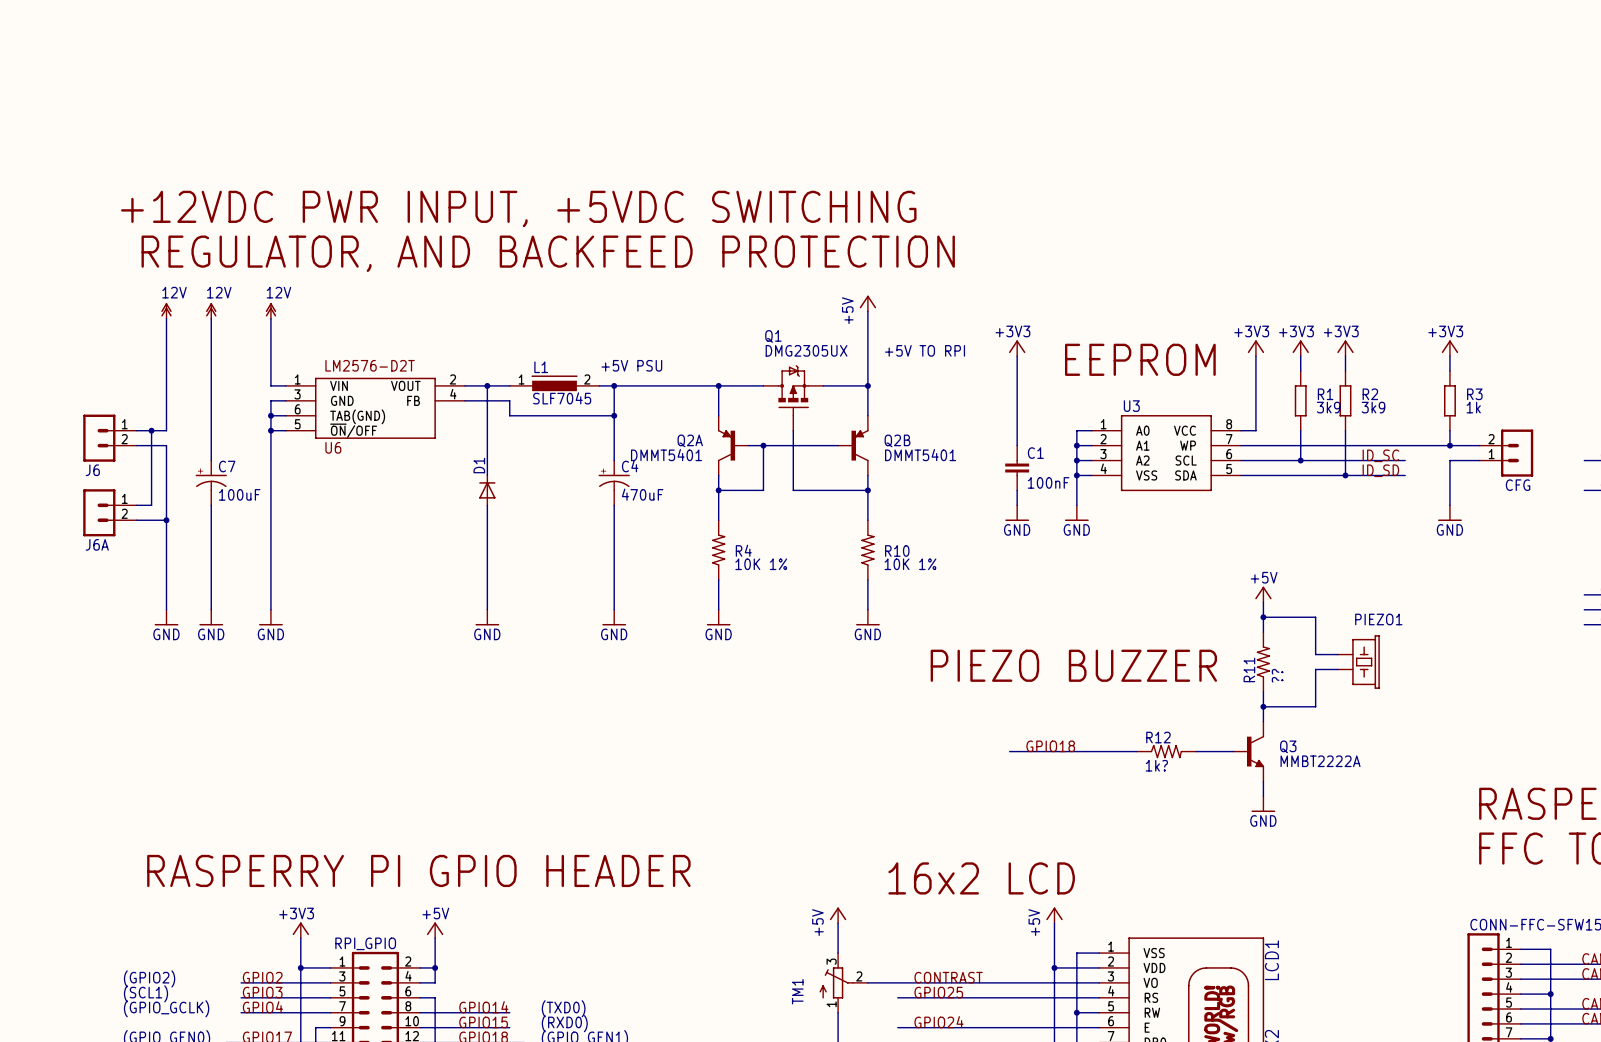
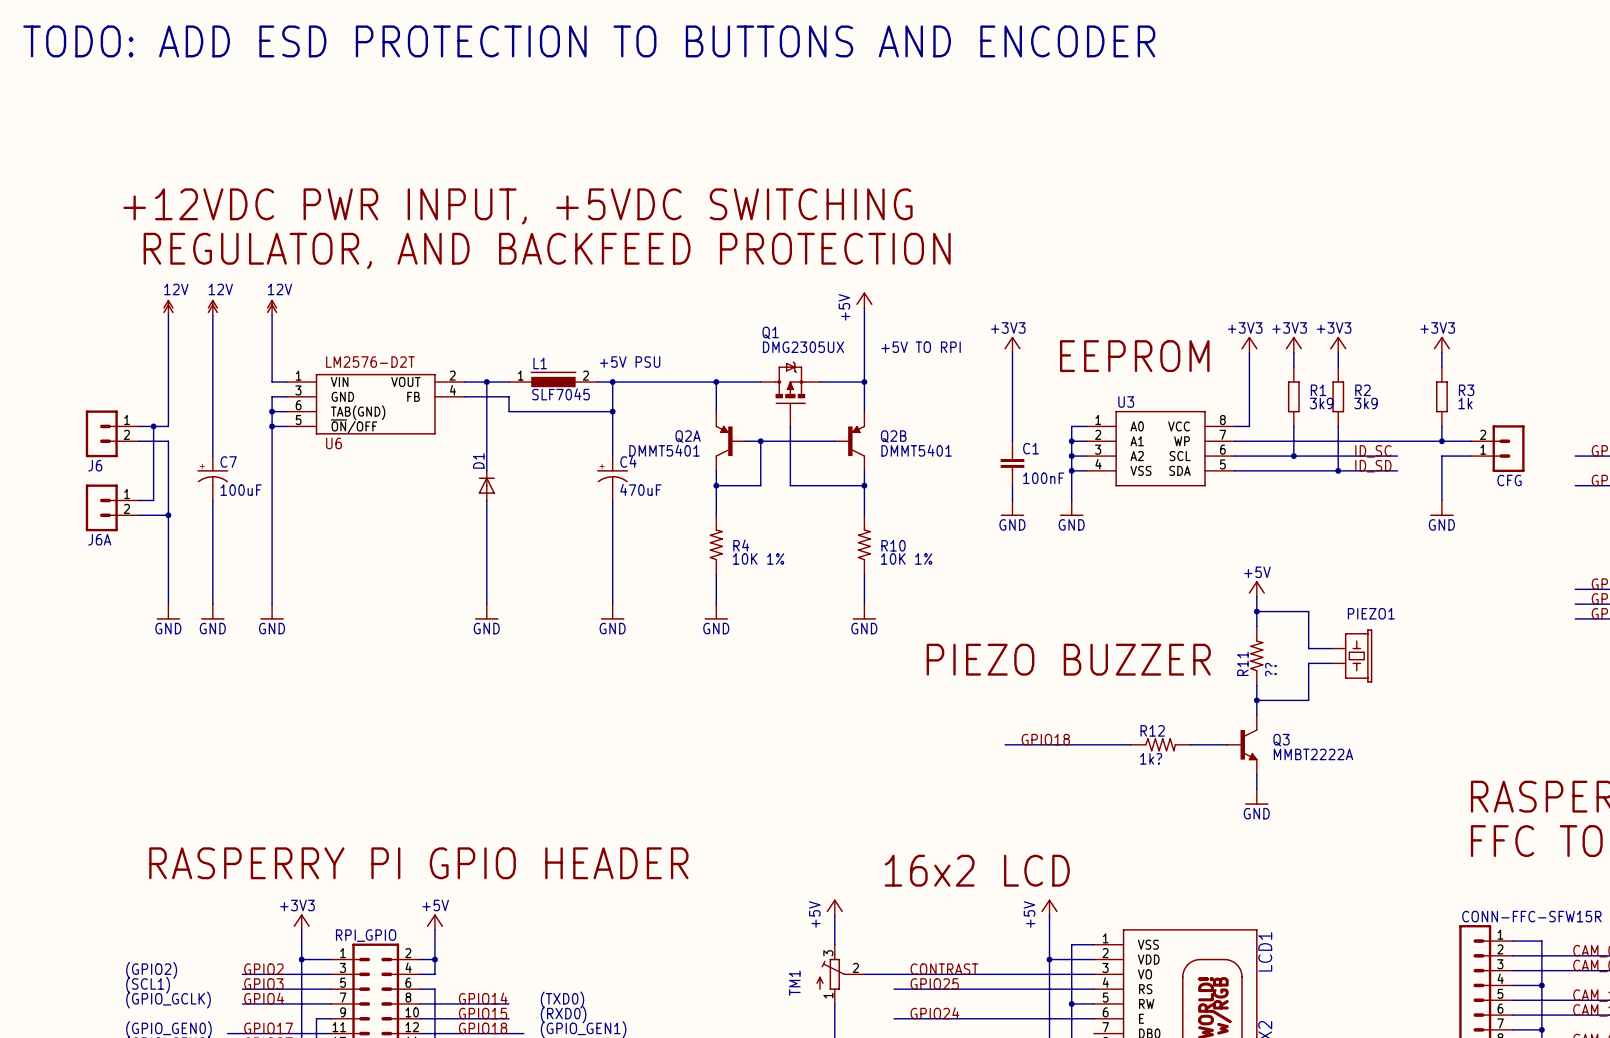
text: none -> TODO: ADD ESD PROTECTION TO BUTTONS AND ENCODER (589, 41)

